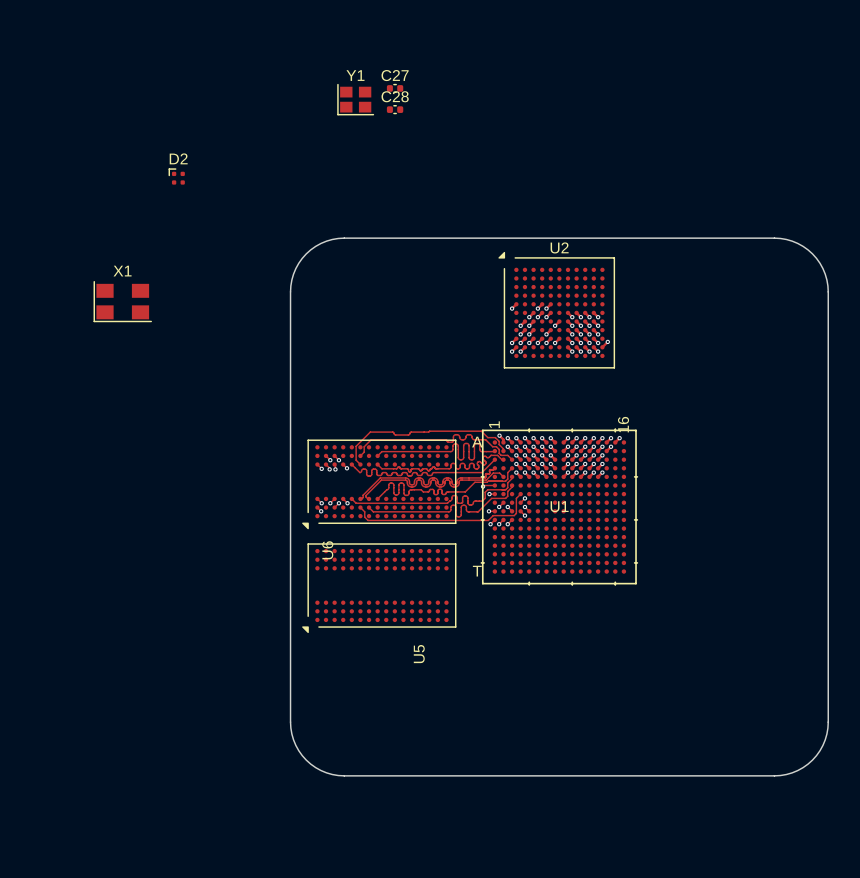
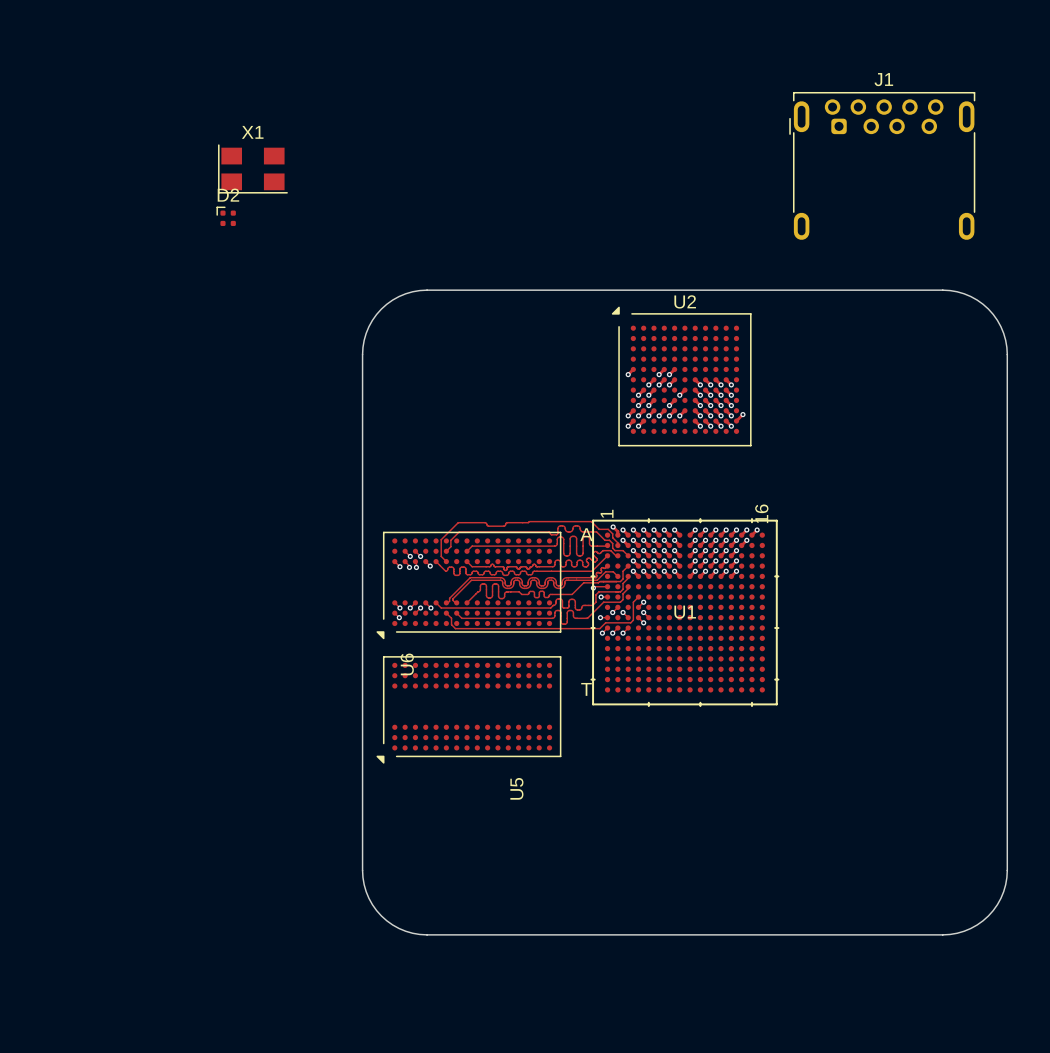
C27: (395, 88) -> none
Y1: (355, 99) -> none
C28: (395, 109) -> none
J1: none -> (882, 165)
X1 position: (122, 301) -> (252, 168)

